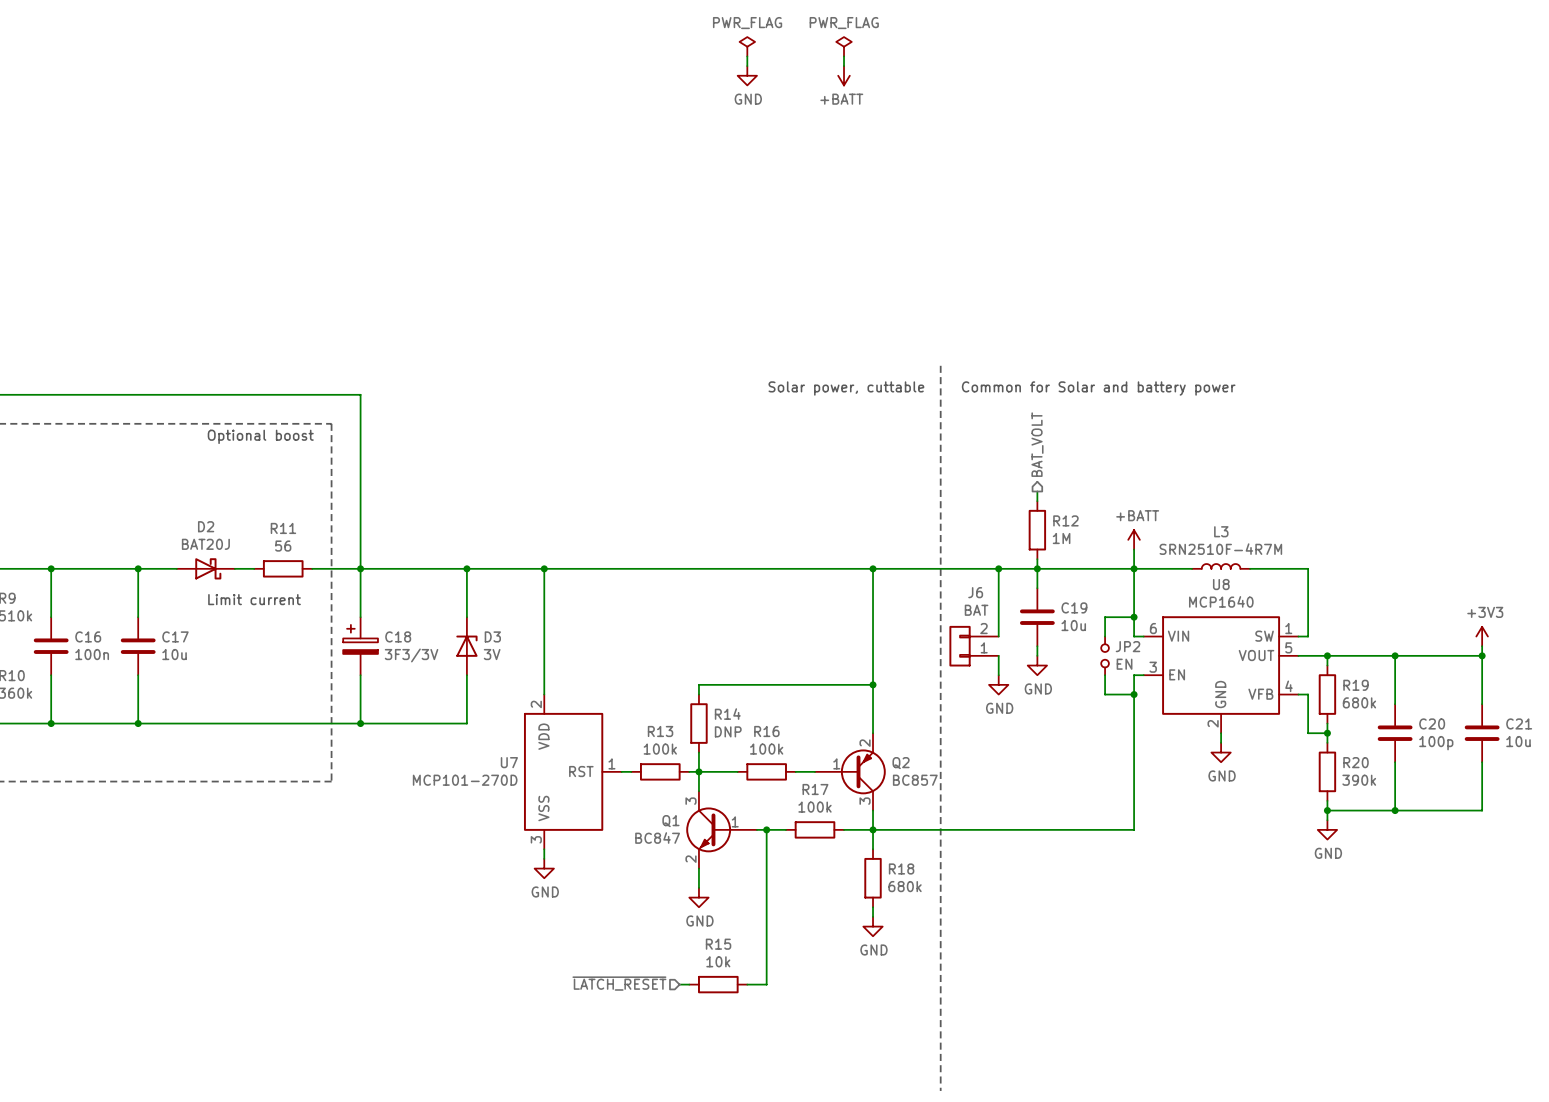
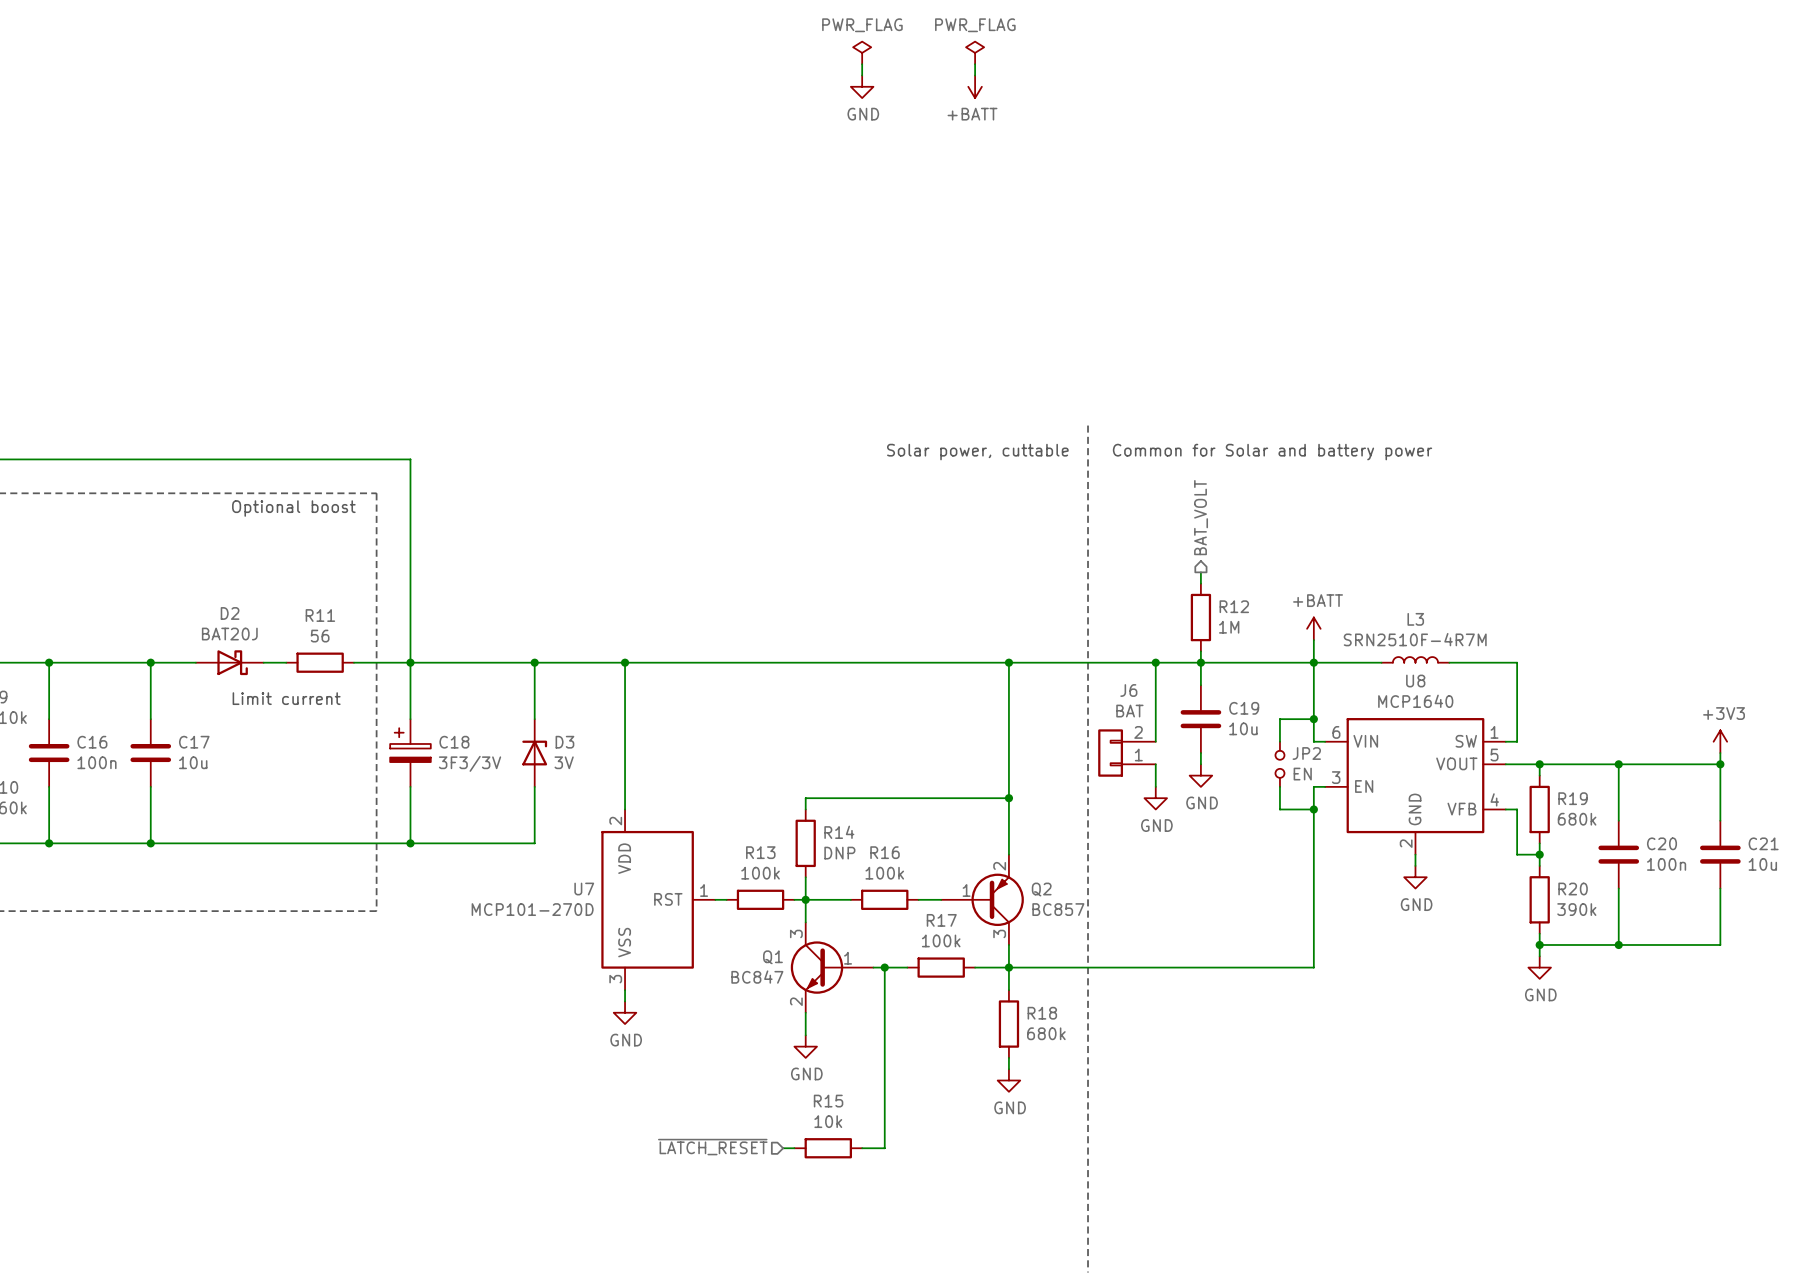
C20 value: 100p (1436, 743) -> 100n (1666, 864)

